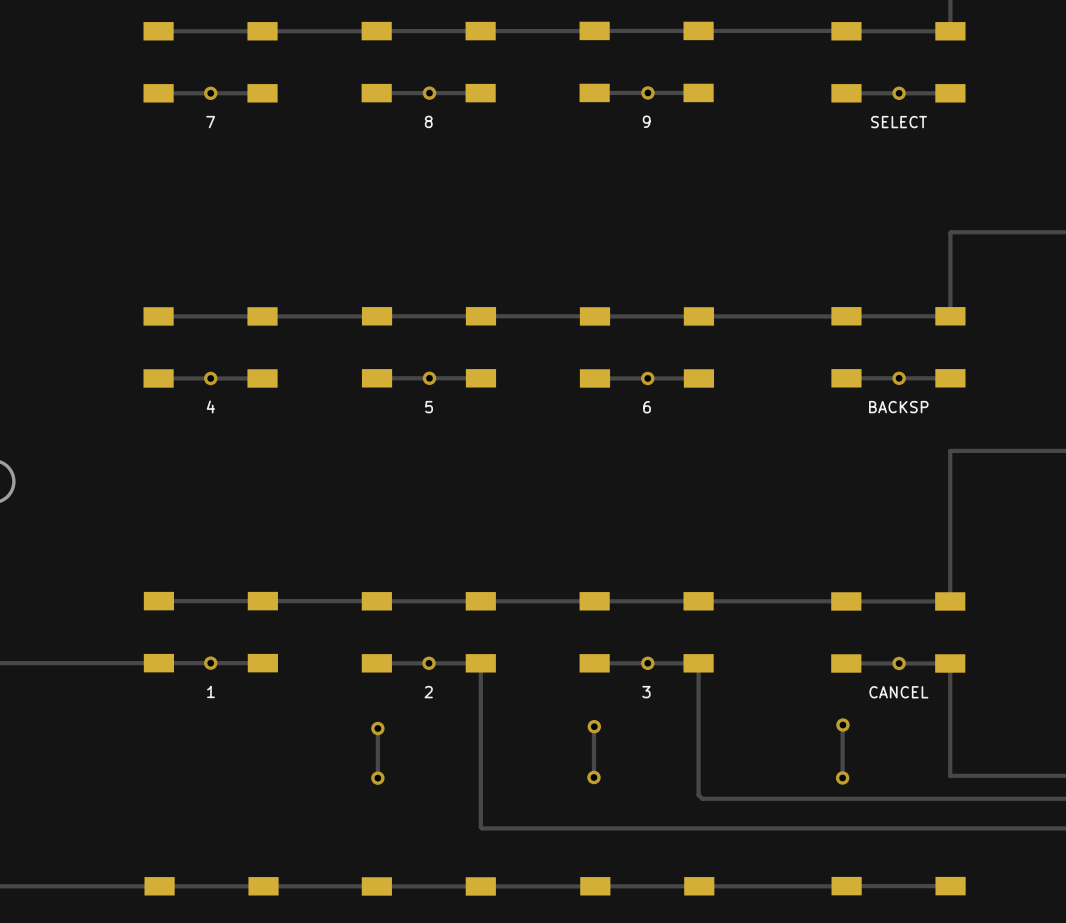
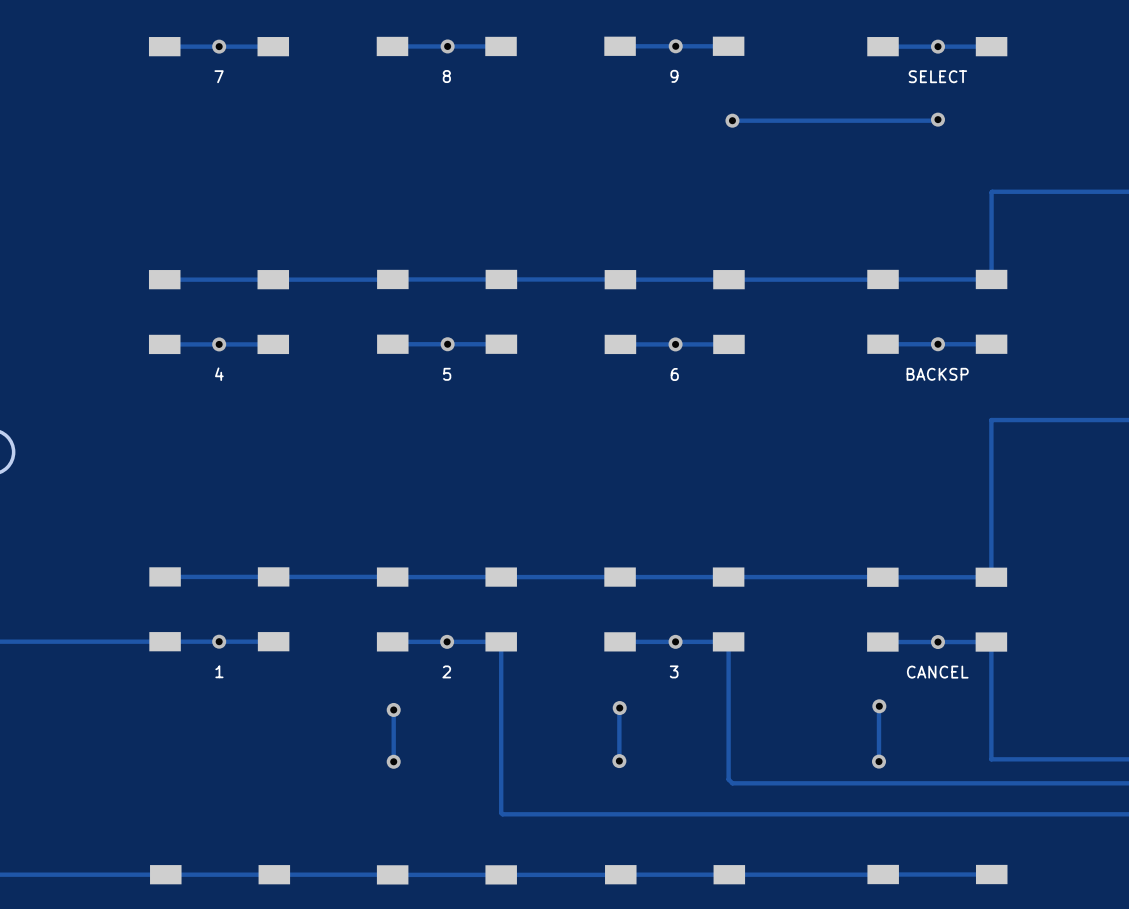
track: none -> (937, 119) (732, 120)
via: none -> (937, 119)
via: none -> (732, 120)

